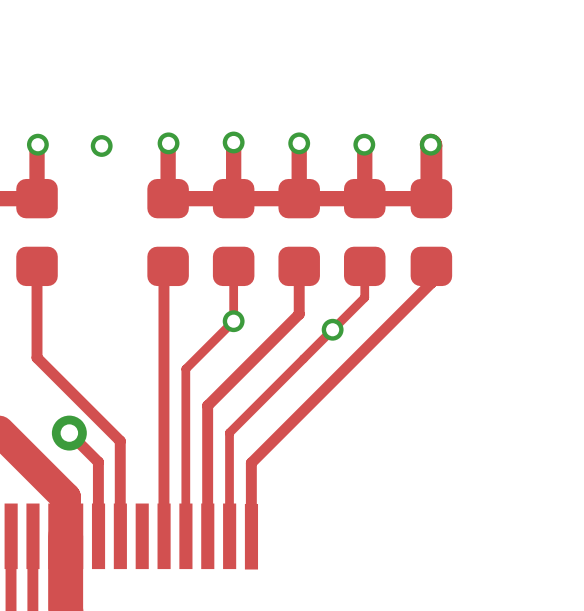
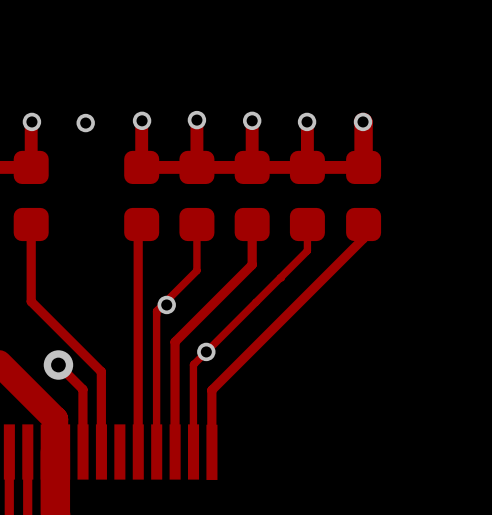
via: (233, 321) -> none
via: (332, 329) -> none
via: none -> (166, 304)
via: none -> (206, 351)

